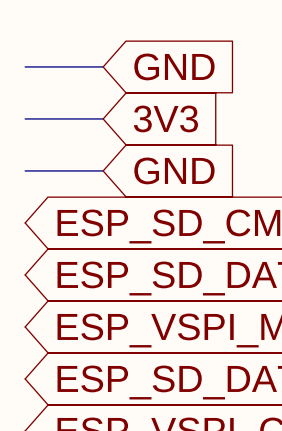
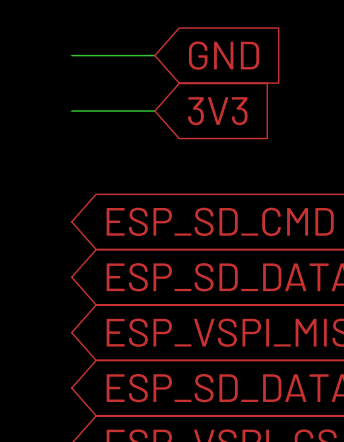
wire: (25, 170) (103, 170) -> none
global label: GND (174, 170) -> none

